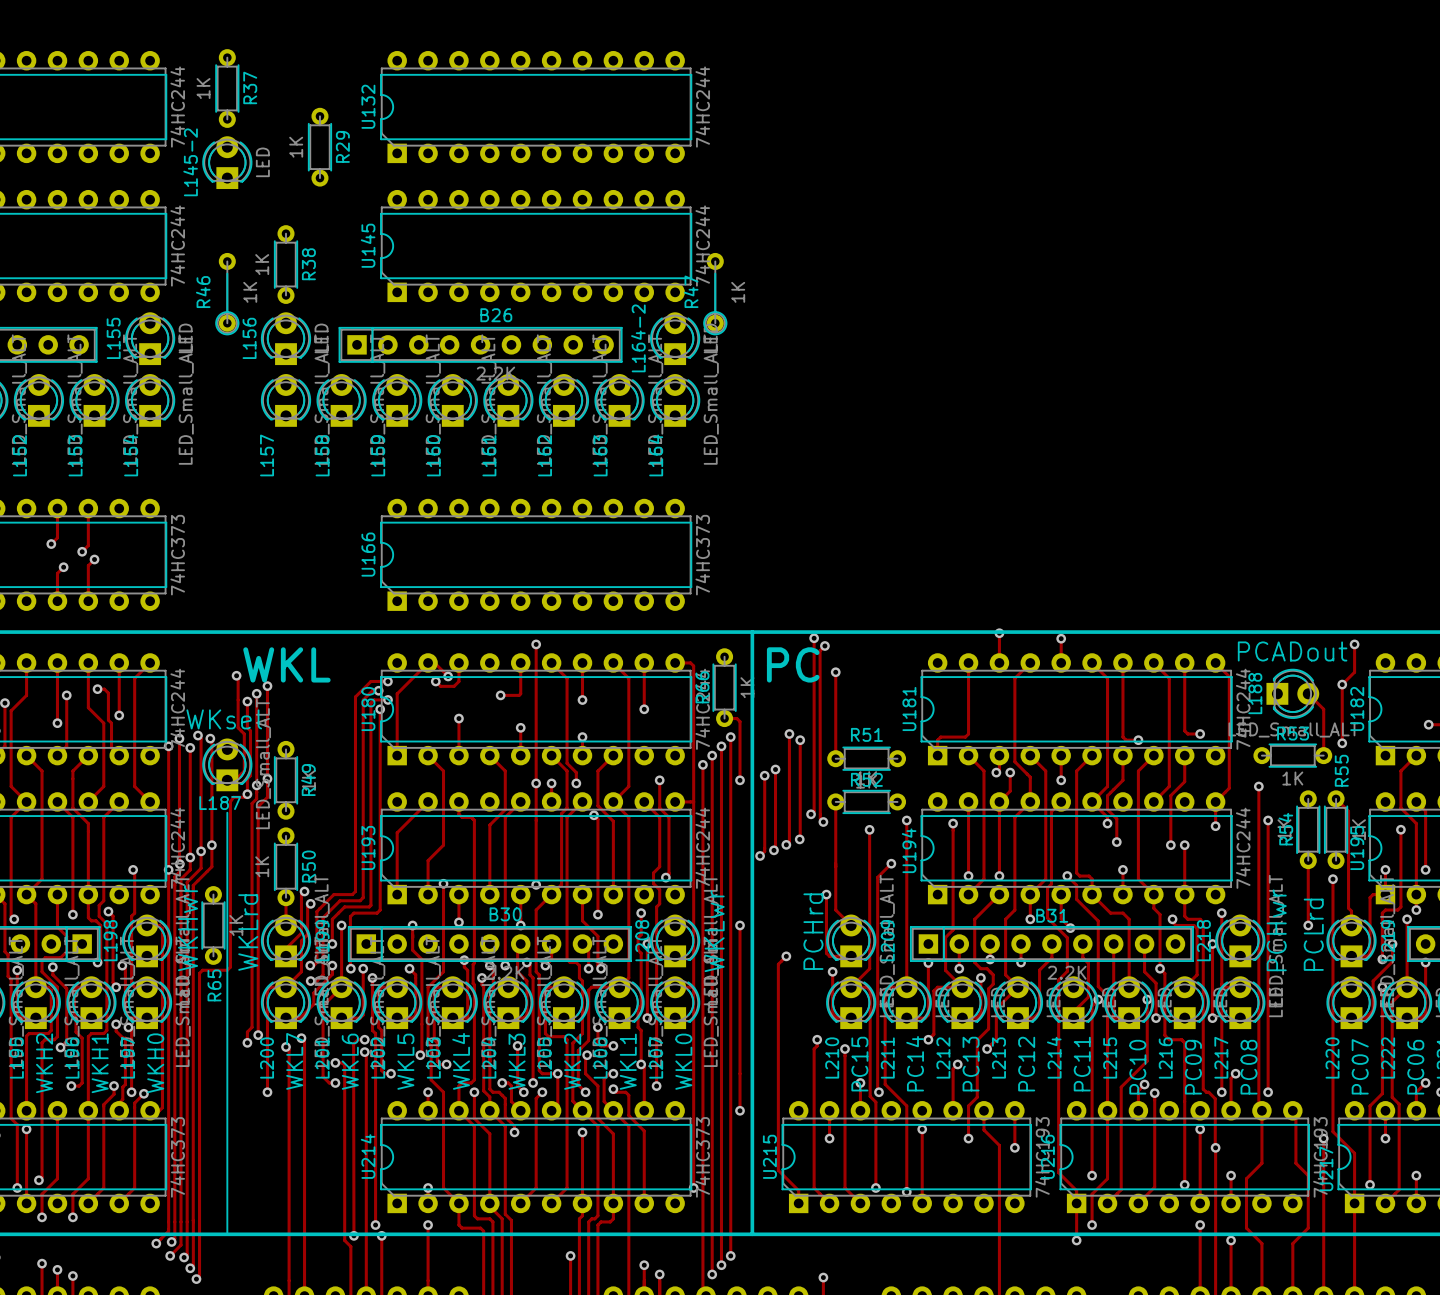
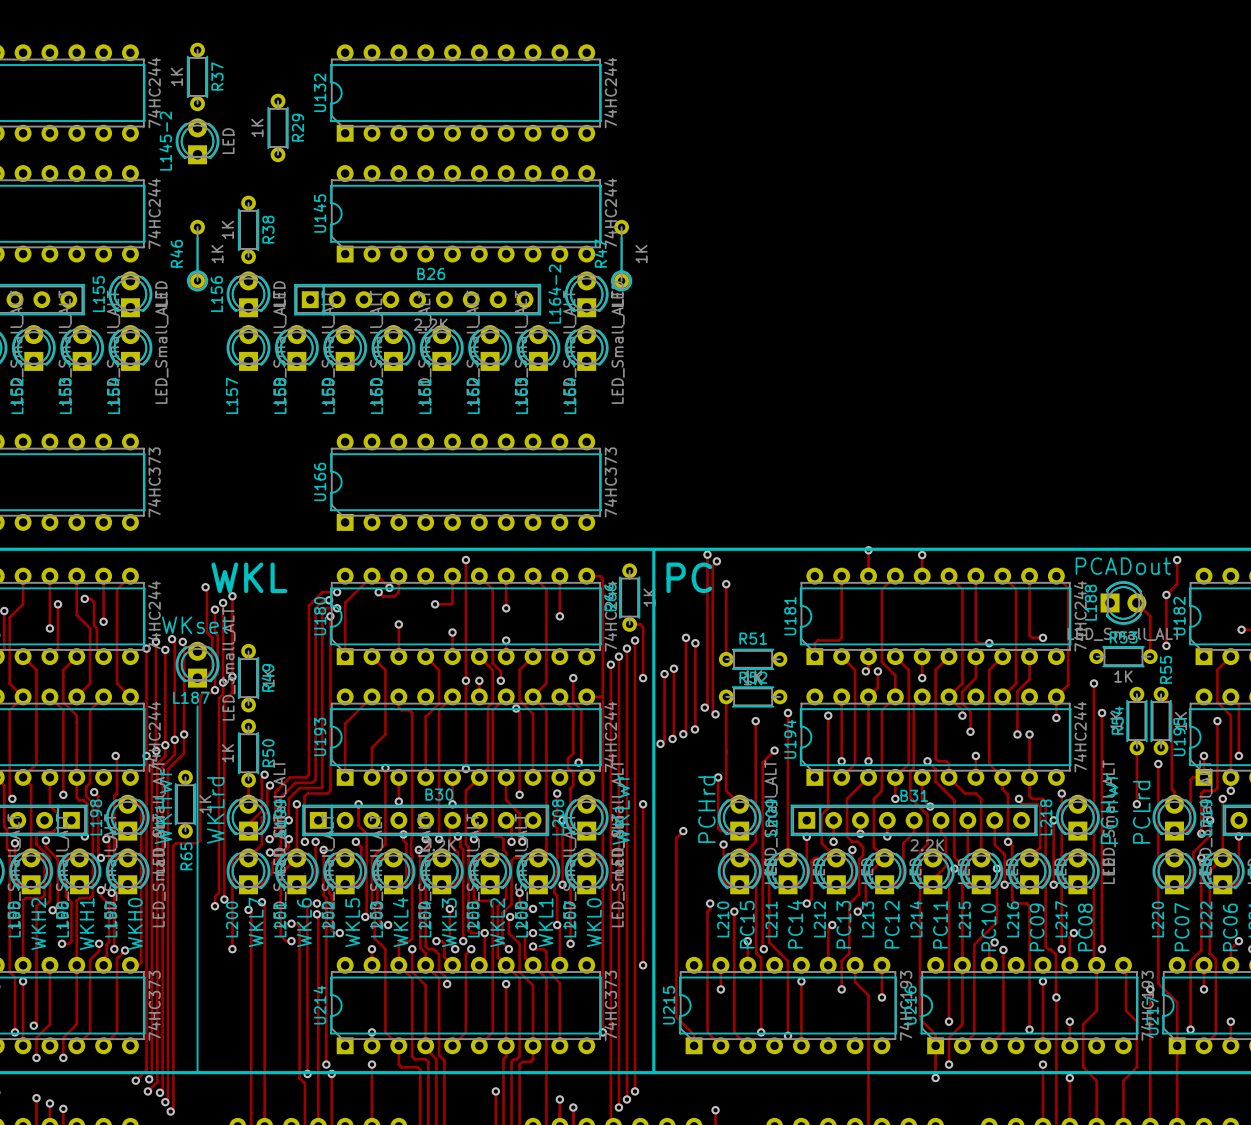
track: (57, 508) (57, 537) (51, 544) -> none
track: (88, 508) (88, 545) (82, 551) -> none
via: (51, 544) -> none
via: (82, 551) -> none
track: (94, 559) (88, 565) (88, 601) -> none
via: (94, 559) -> none
track: (63, 567) (57, 573) (57, 601) -> none
via: (63, 567) -> none

